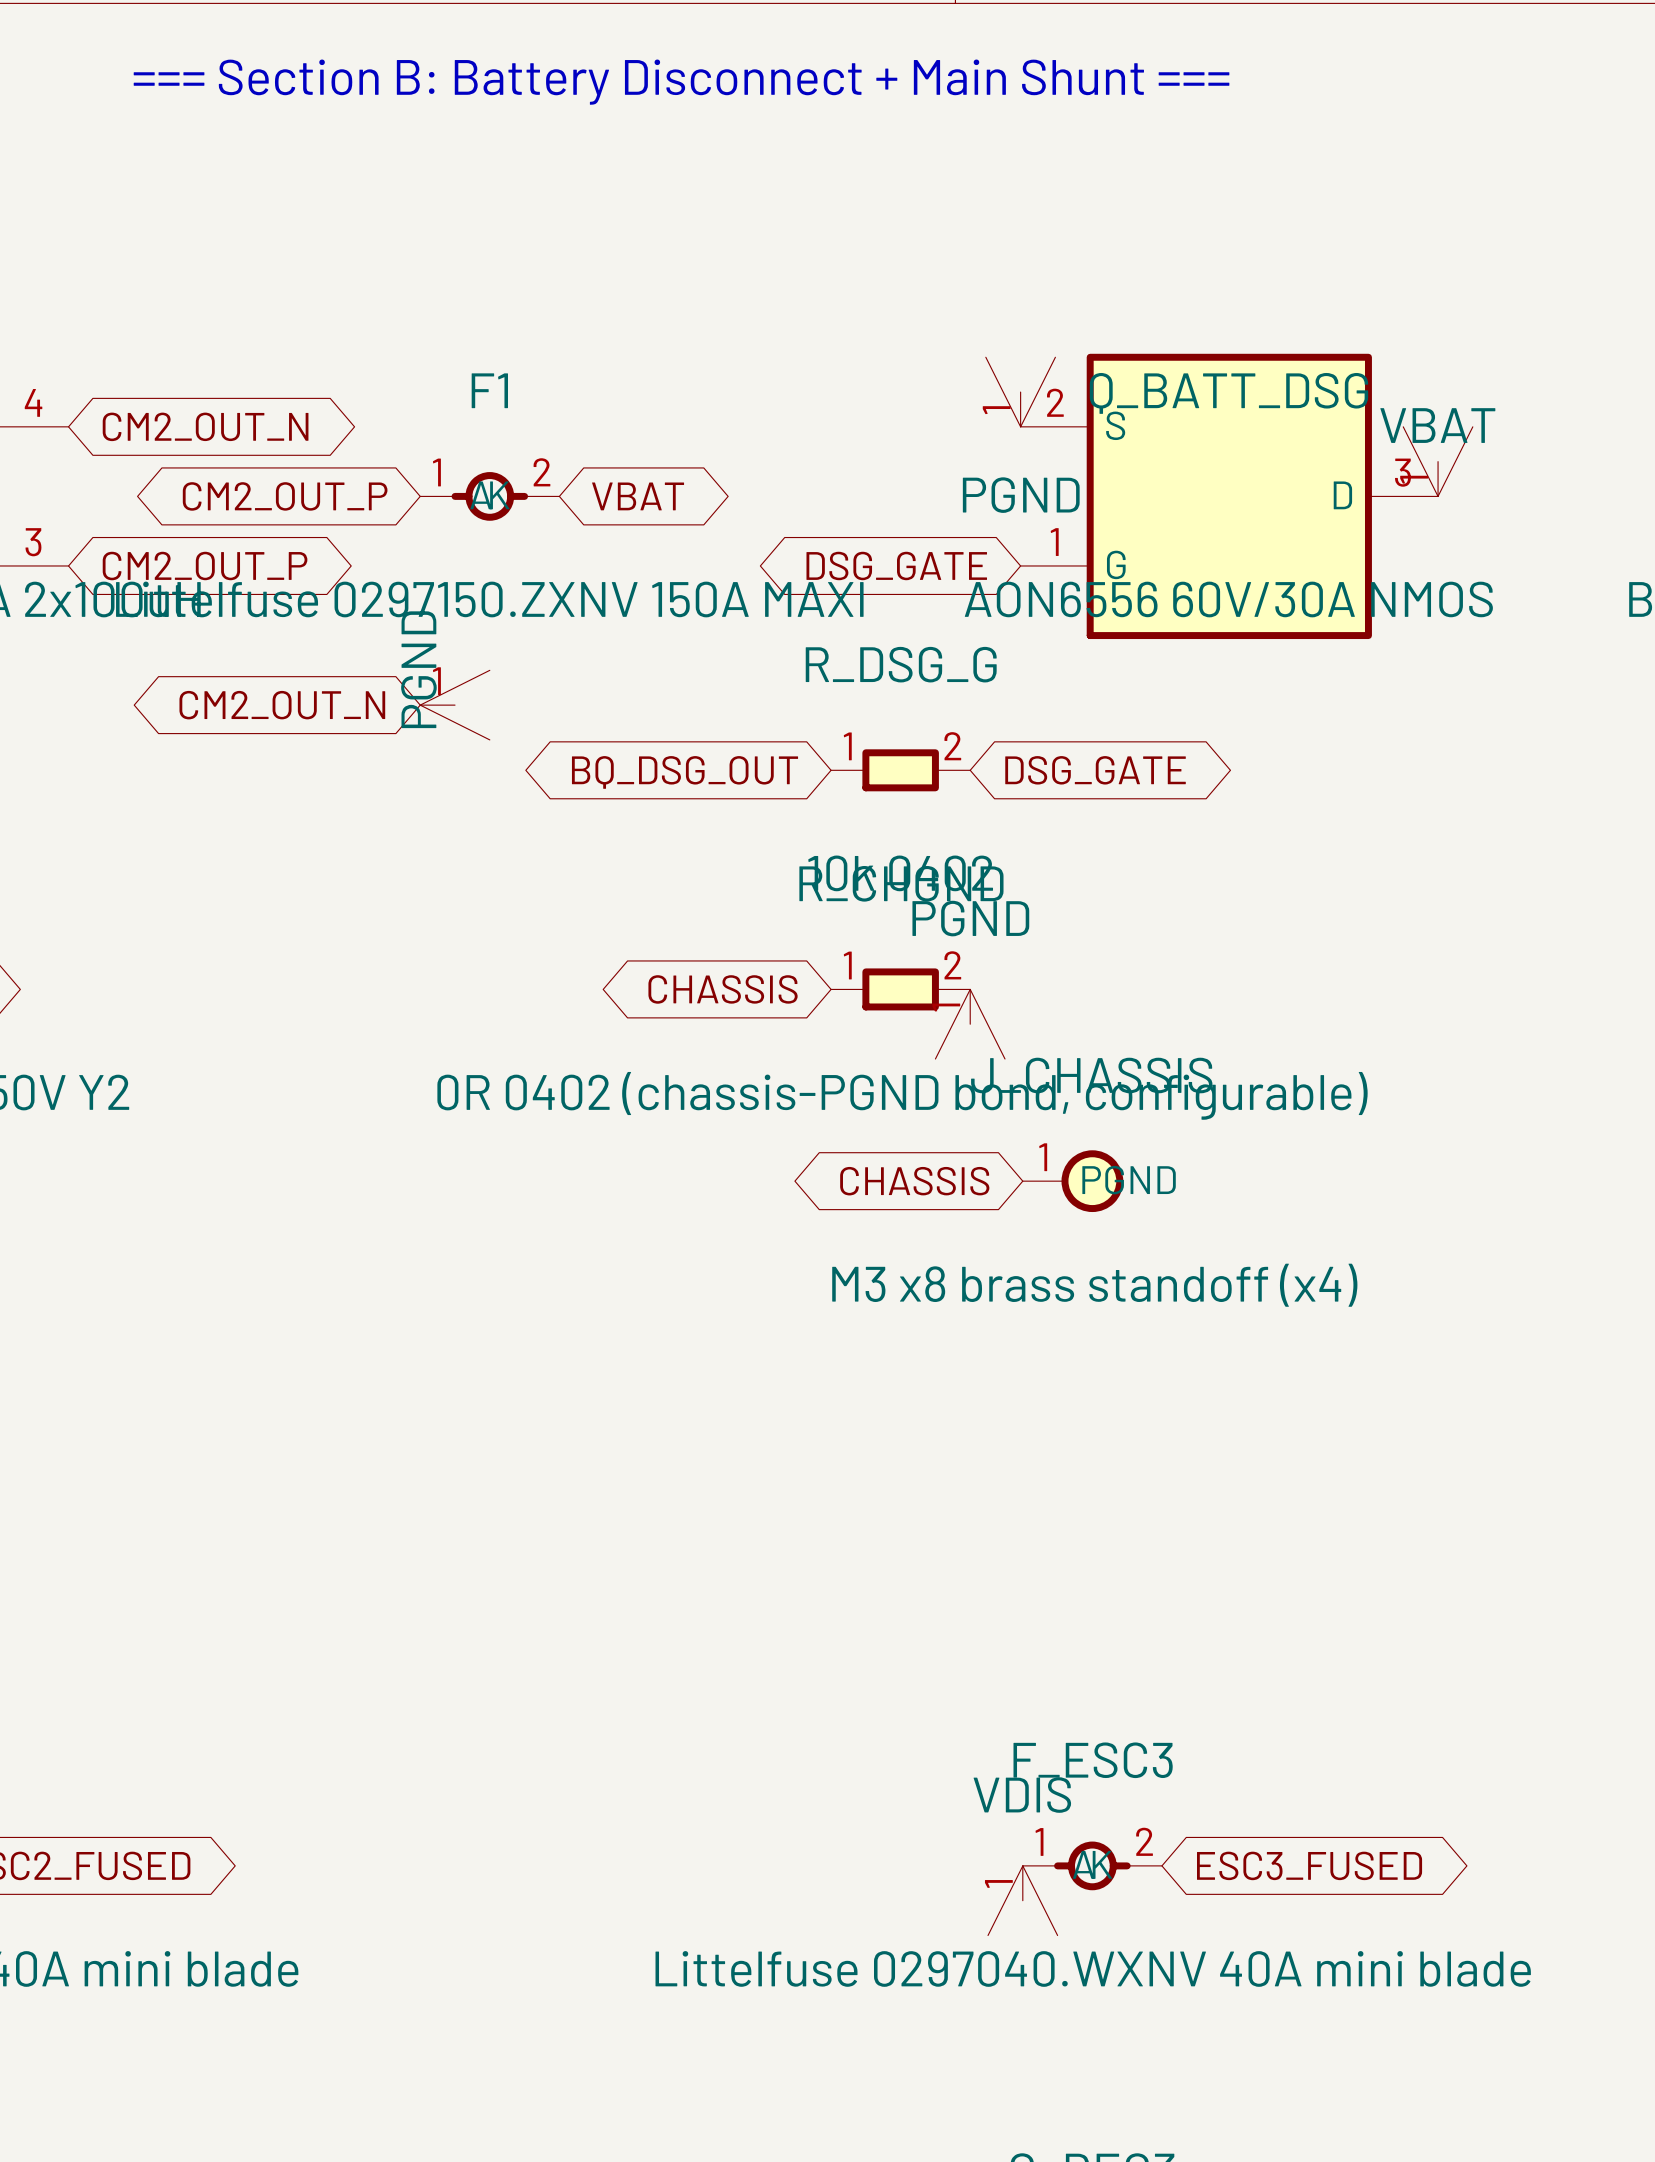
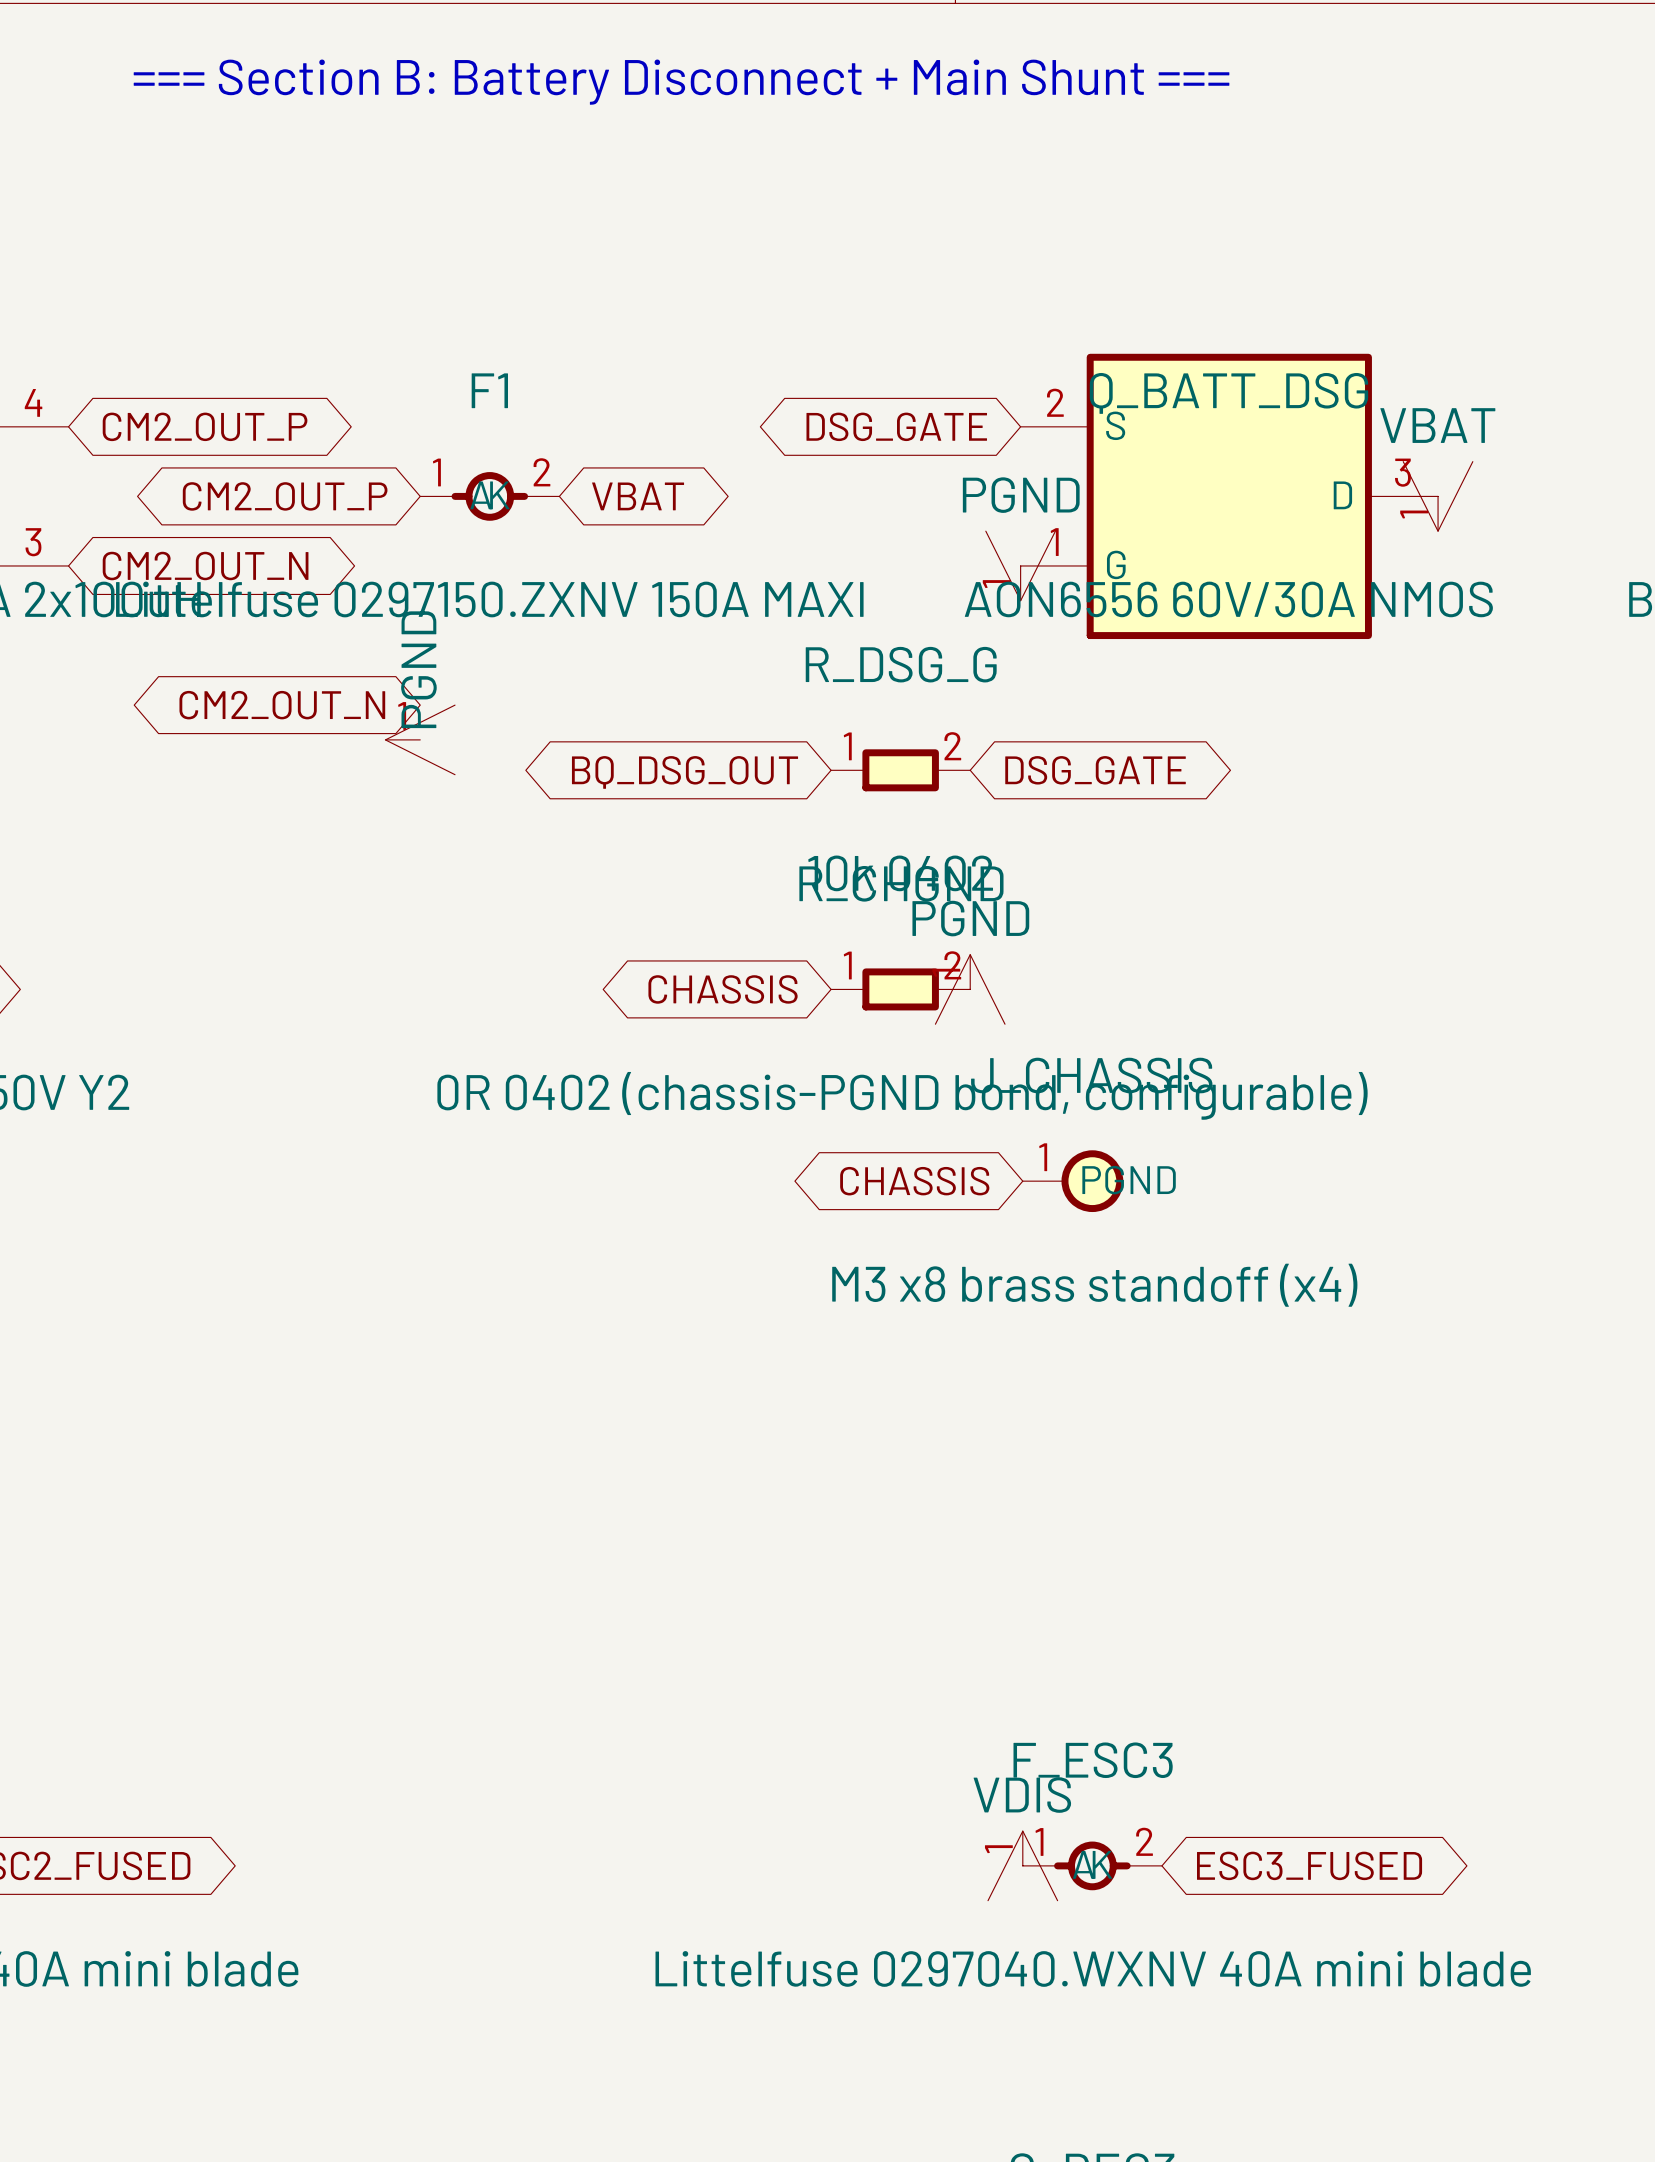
power symbol position: PGND (1020, 392) -> PGND (1020, 565)
global label: CM2_OUT_N (205, 426) -> CM2_OUT_P (205, 426)
power symbol position: VBAT (1438, 461) -> VBAT (1438, 496)
global label position: DSG_GATE (896, 565) -> DSG_GATE (896, 426)
global label: CM2_OUT_P (205, 566) -> CM2_OUT_N (205, 566)
power symbol position: PGND (455, 705) -> PGND (420, 739)
power symbol position: PGND (970, 1024) -> PGND (970, 989)
power symbol position: VDIS (1022, 1900) -> VDIS (1022, 1865)

